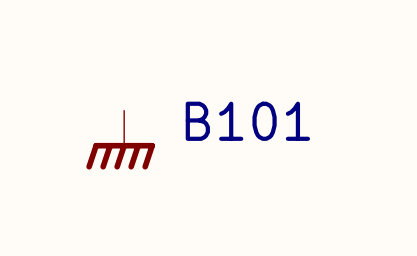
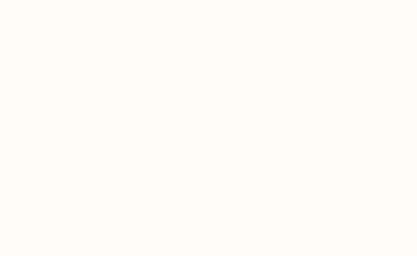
B101: (120, 140) -> none

